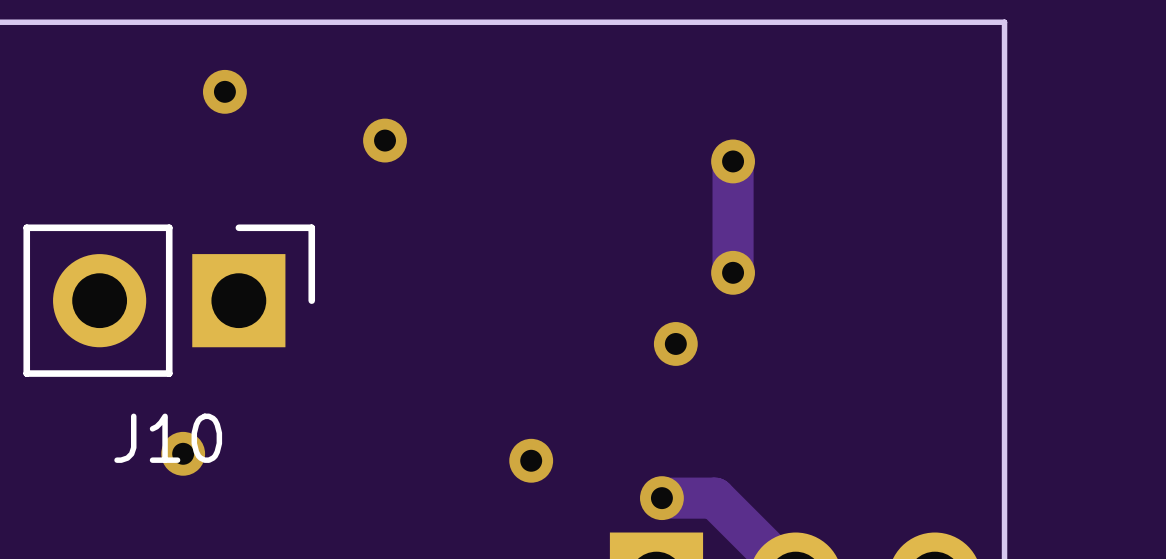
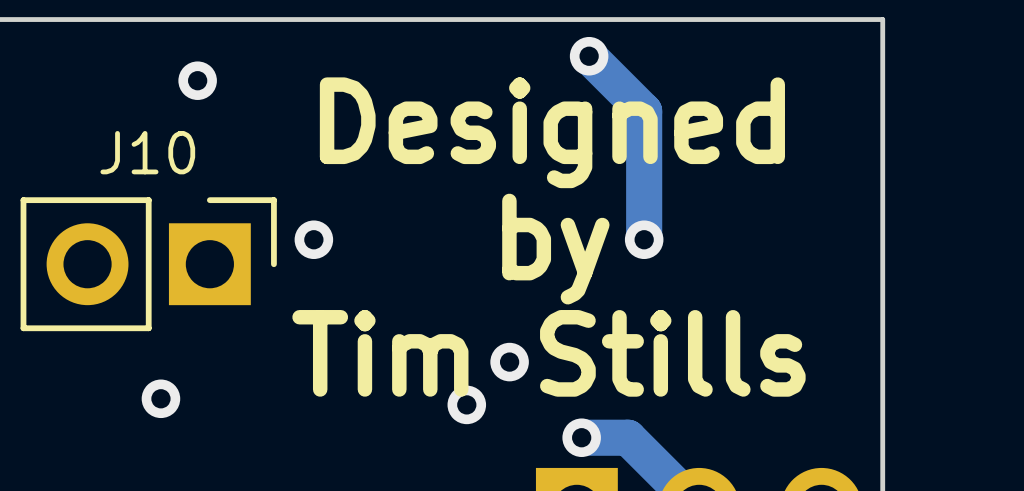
track: none -> (589, 56) (644, 111) (644, 141)
via position: (385, 140) -> (313, 239)
text: none -> Designed (552, 132)
via position: (733, 161) -> (589, 56)
text: none -> by (555, 249)
via position: (675, 343) -> (509, 362)
text: none -> Tim Stills (548, 353)
J10 name position: J10 (168, 438) -> J10 (147, 152)

